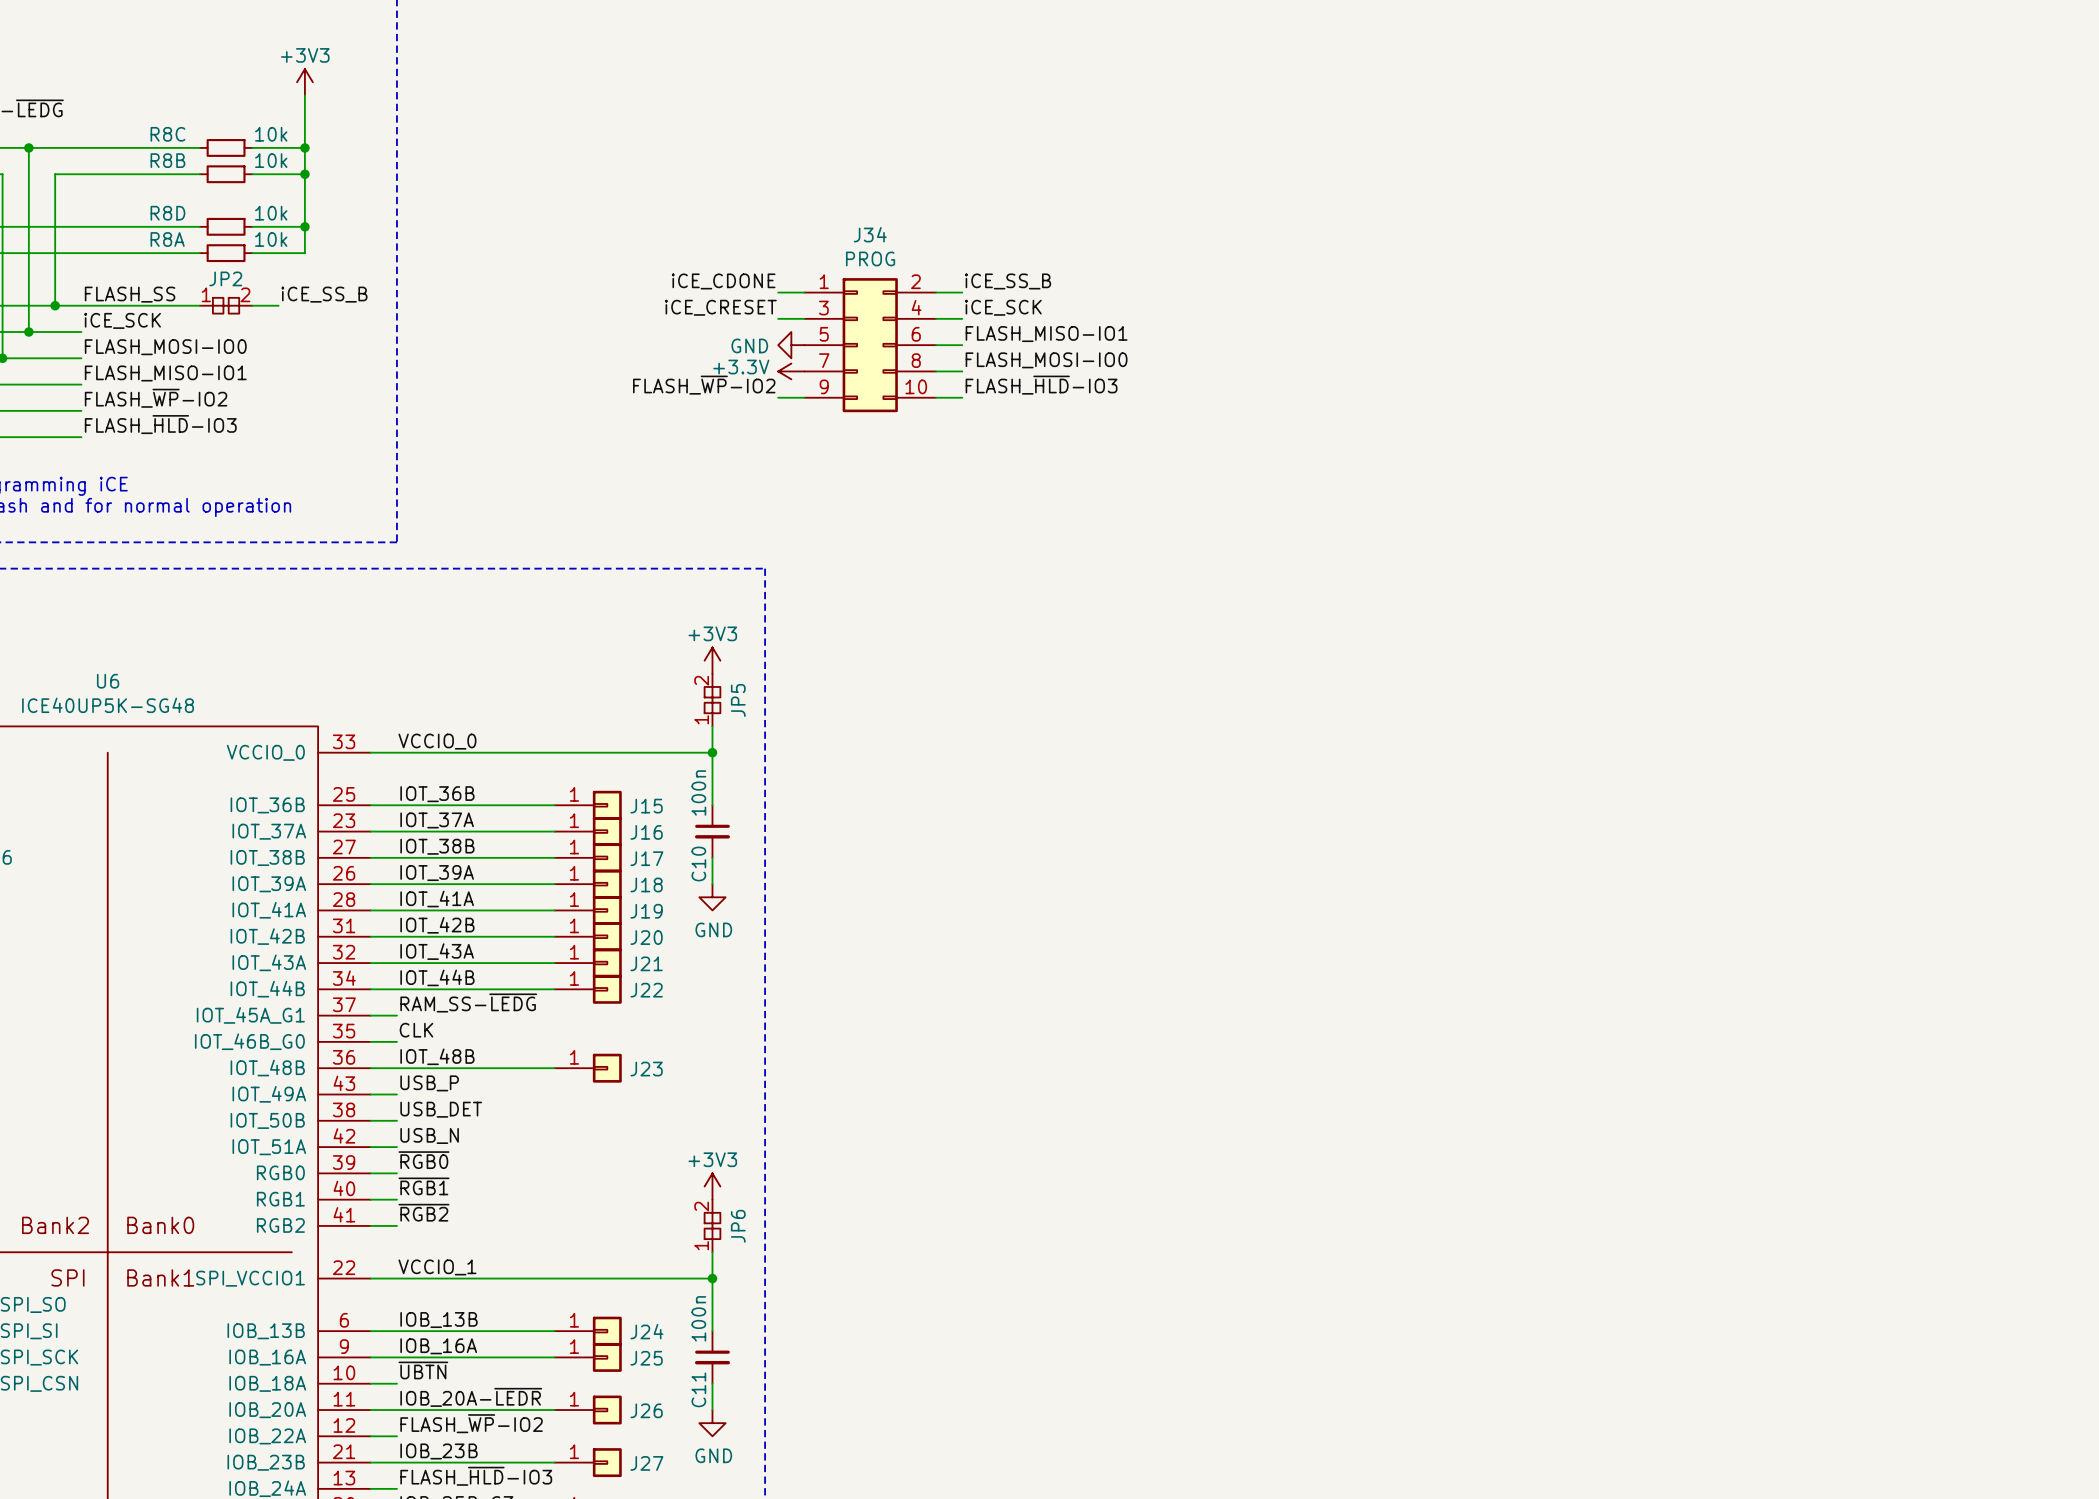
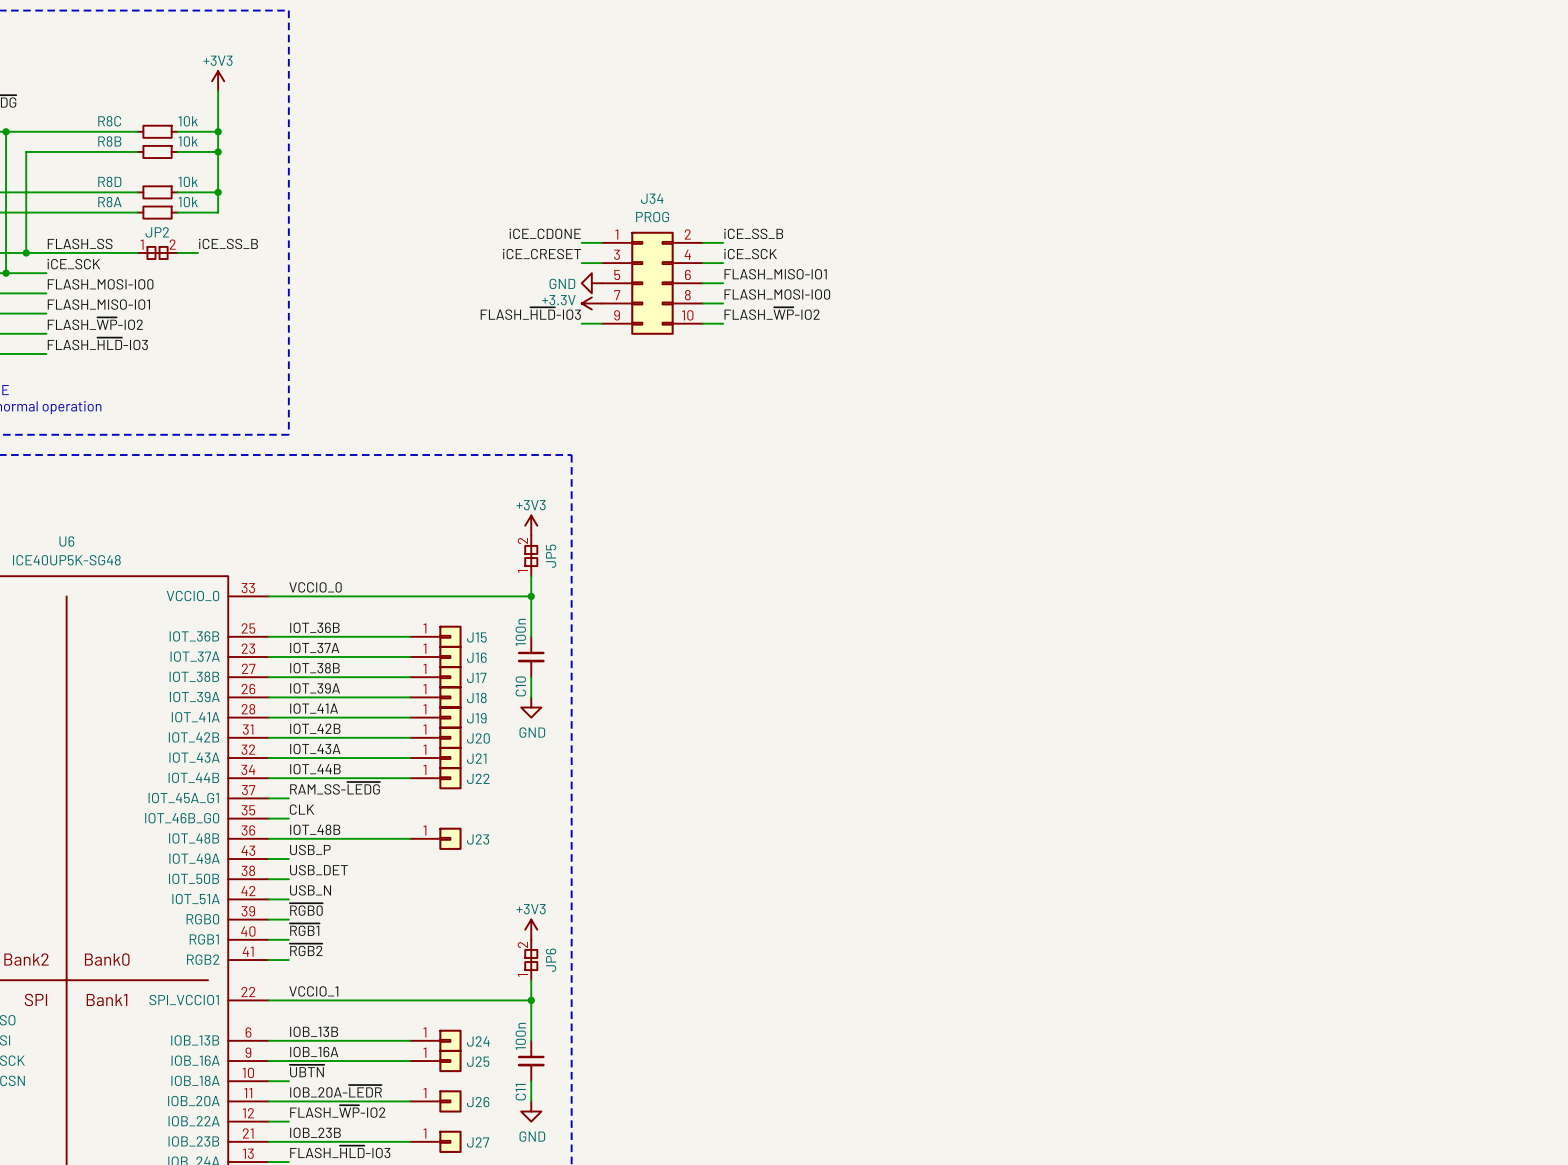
label: FLASH_~{WP}-IO2 (704, 385) -> FLASH_~{HLD}-IO3 (530, 313)
label: FLASH_~{HLD}-IO3 (1041, 385) -> FLASH_~{WP}-IO2 (772, 313)

